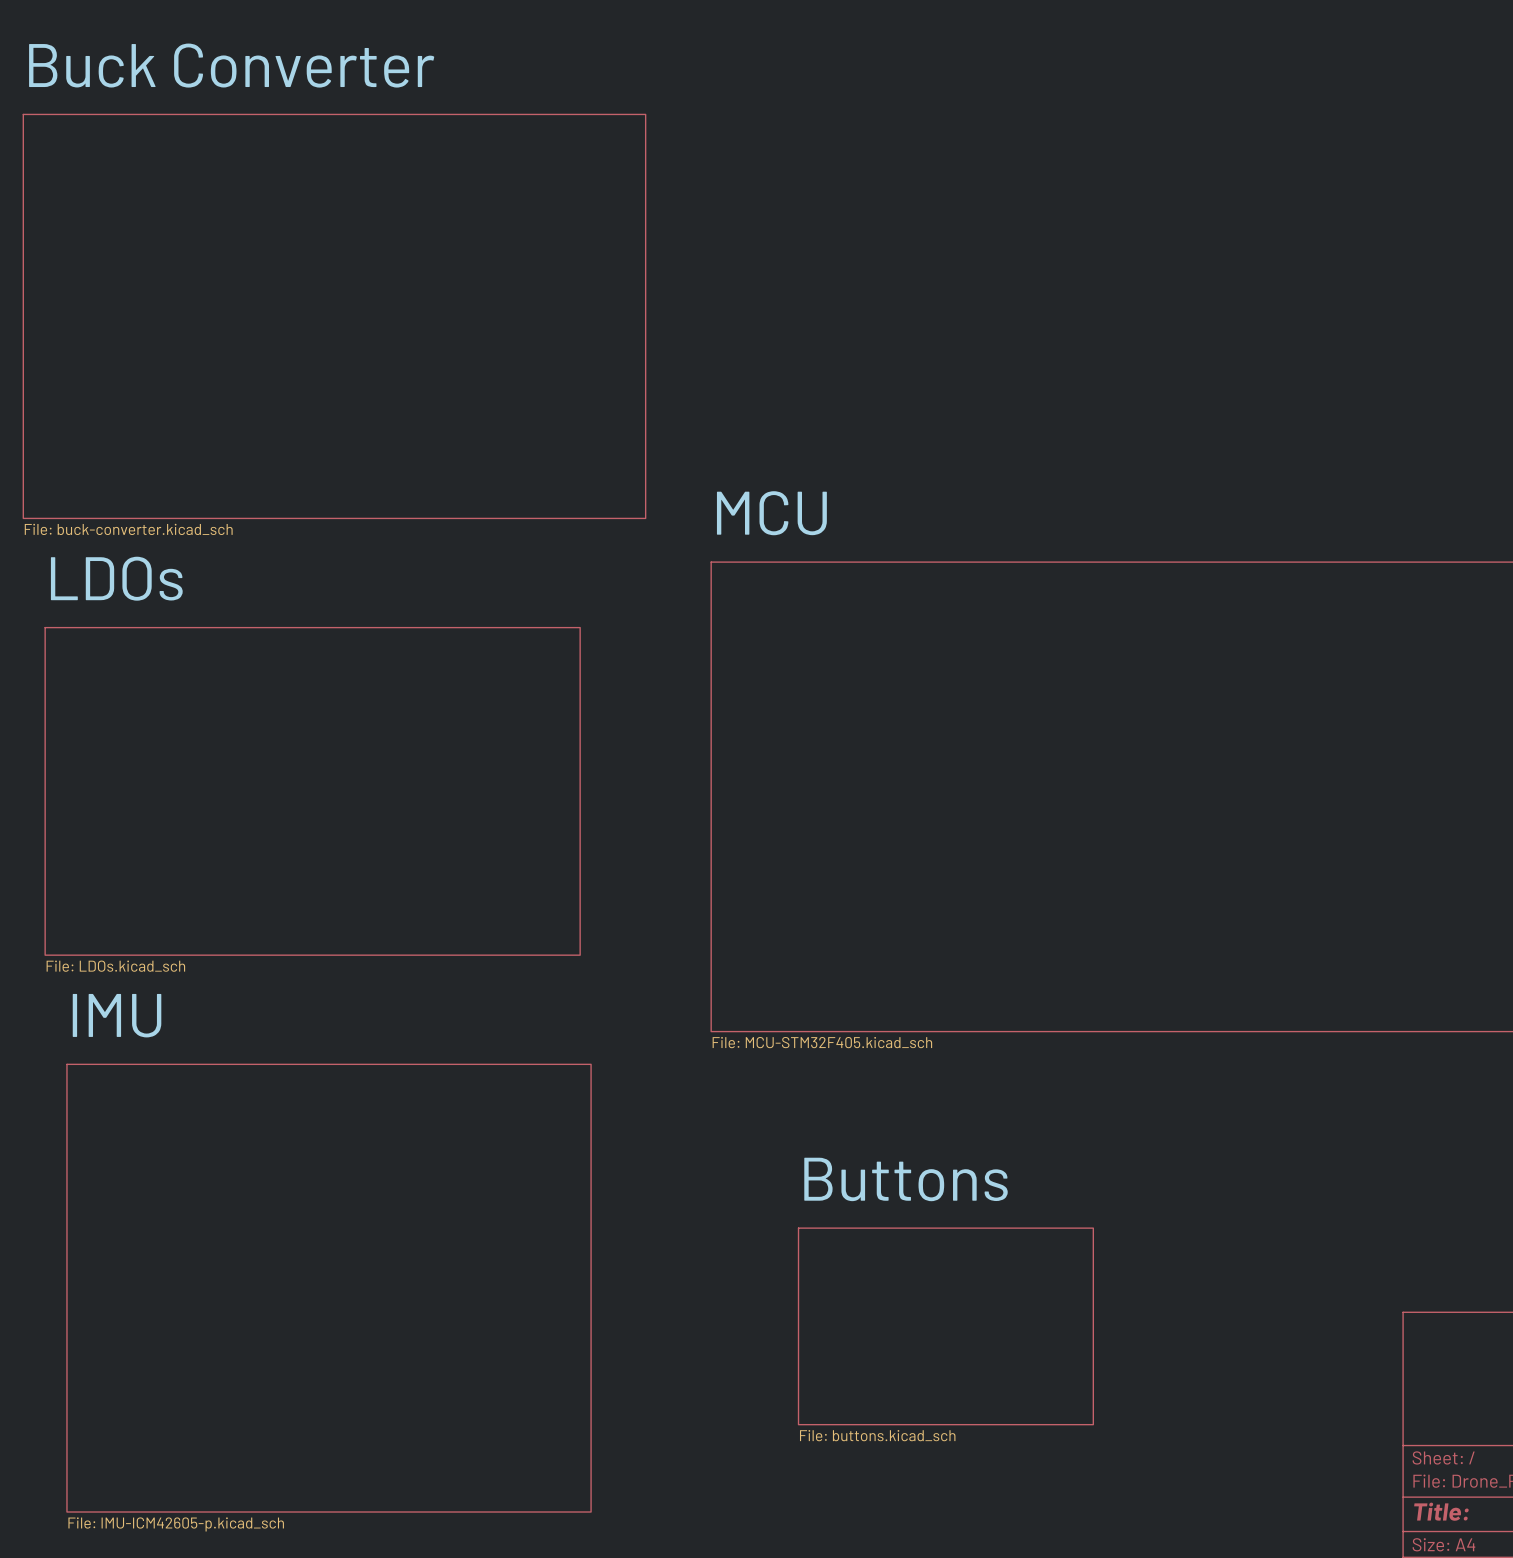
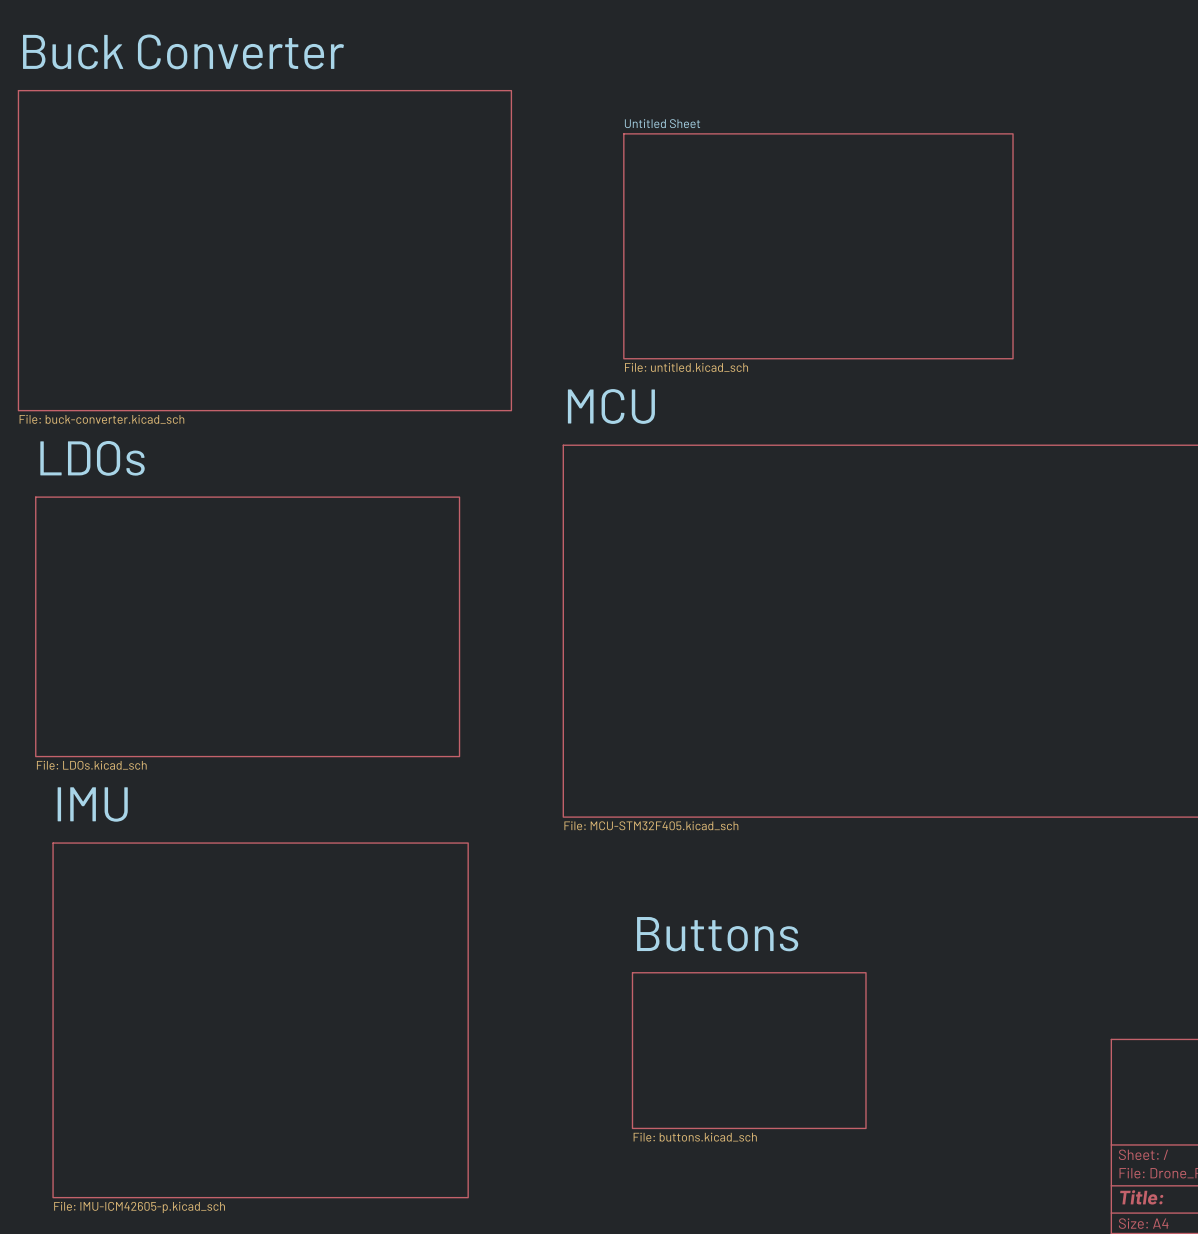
sheet Untitled Sheet: none -> File: untitled.kicad_sch (818, 246)

